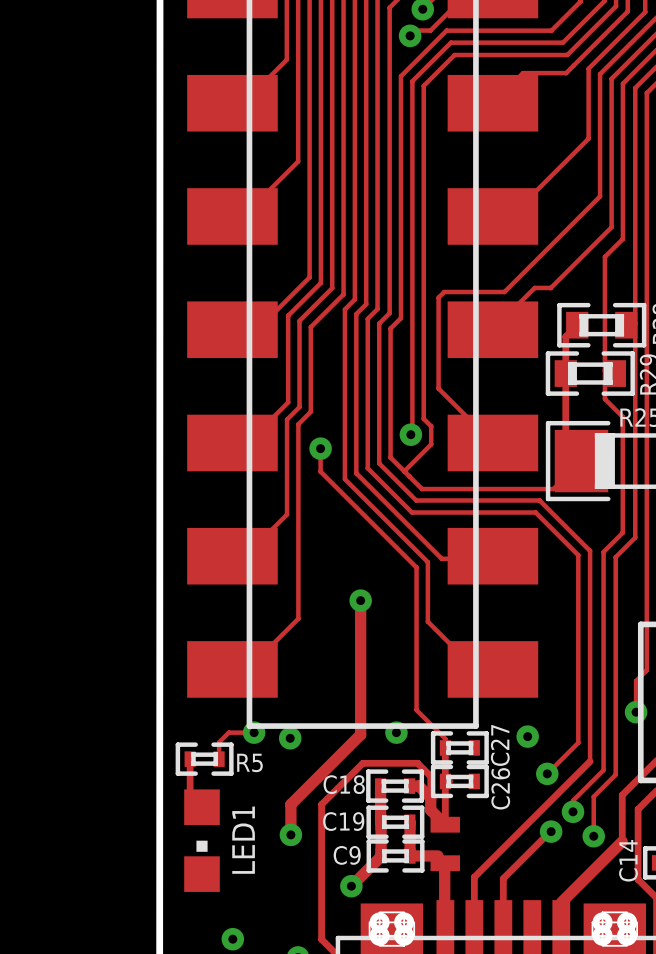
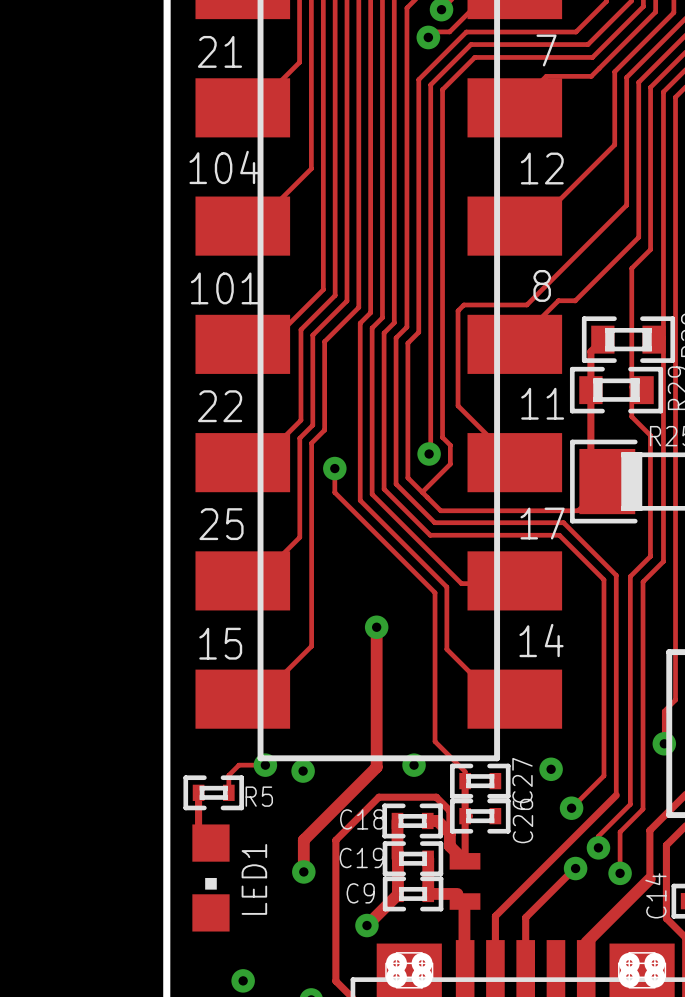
text: none -> 7 (546, 50)
text: none -> 21 (219, 51)
text: none -> 104 (224, 167)
text: none -> 12 (542, 168)
text: none -> 8 (542, 285)
text: none -> 101 (225, 288)
text: none -> 11 (542, 403)
text: none -> 22 (220, 406)
text: none -> 25 (221, 524)
text: none -> 17 (542, 523)
text: none -> 14 (541, 640)
text: none -> 15 (220, 643)

